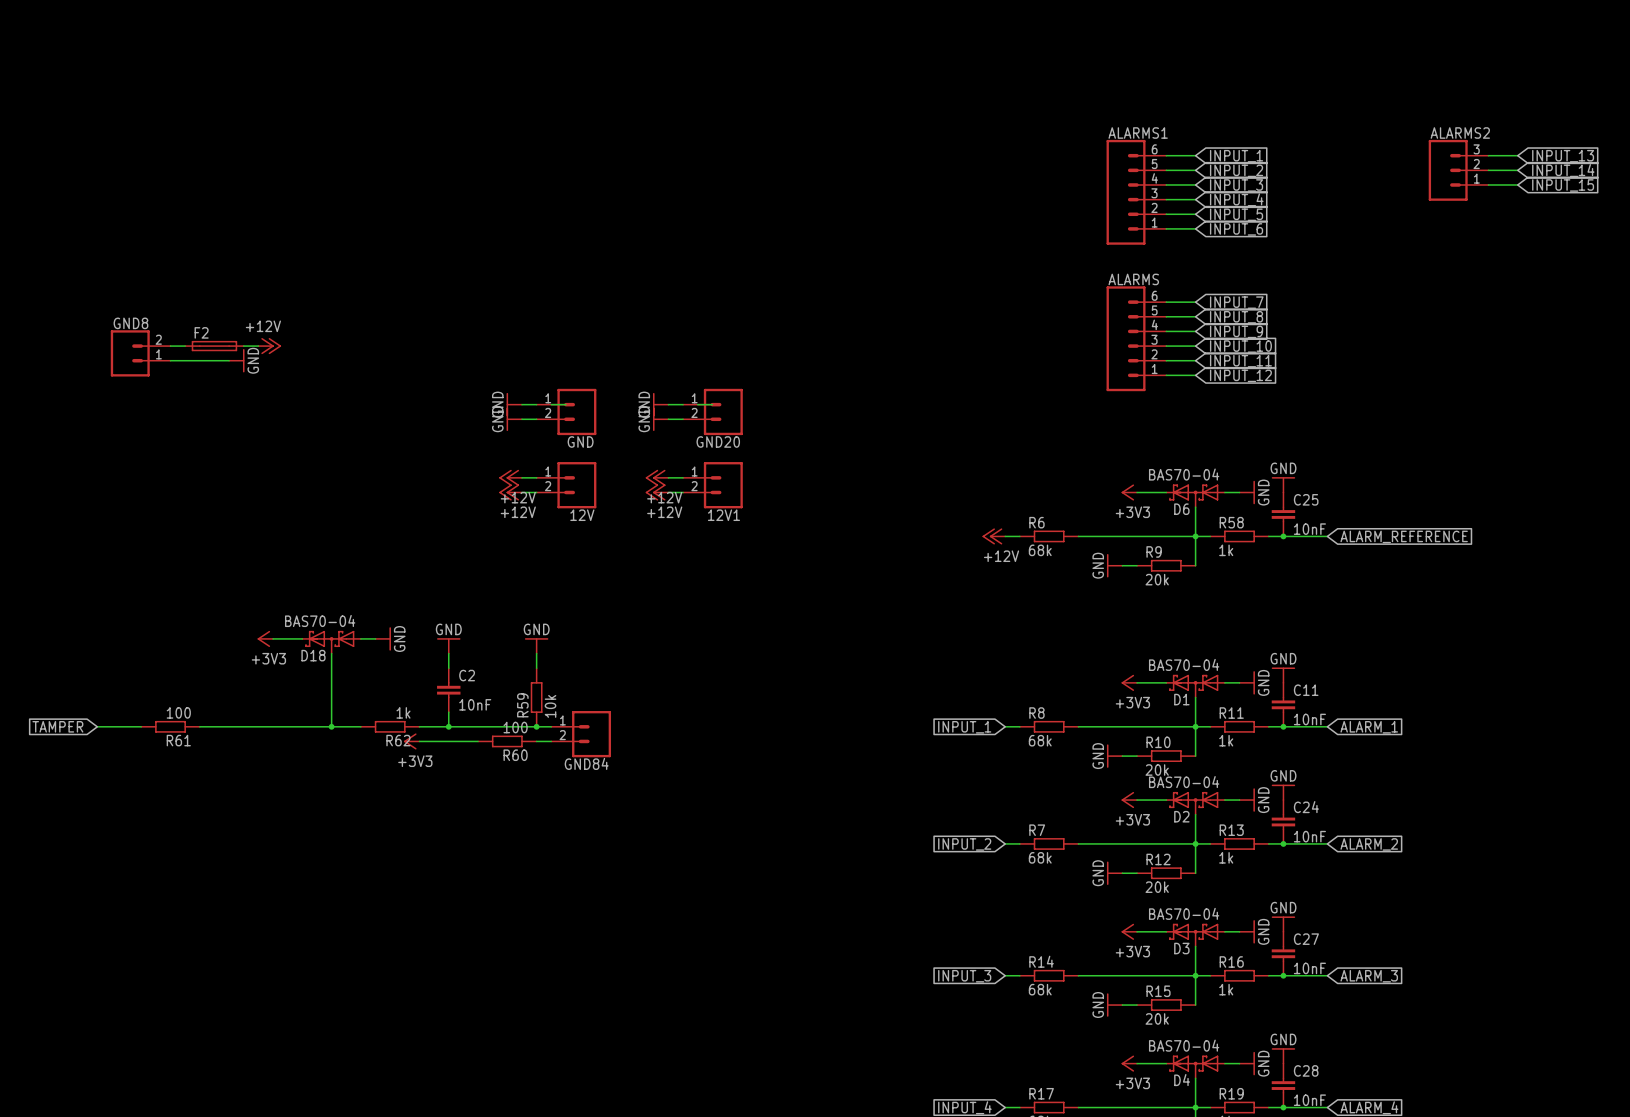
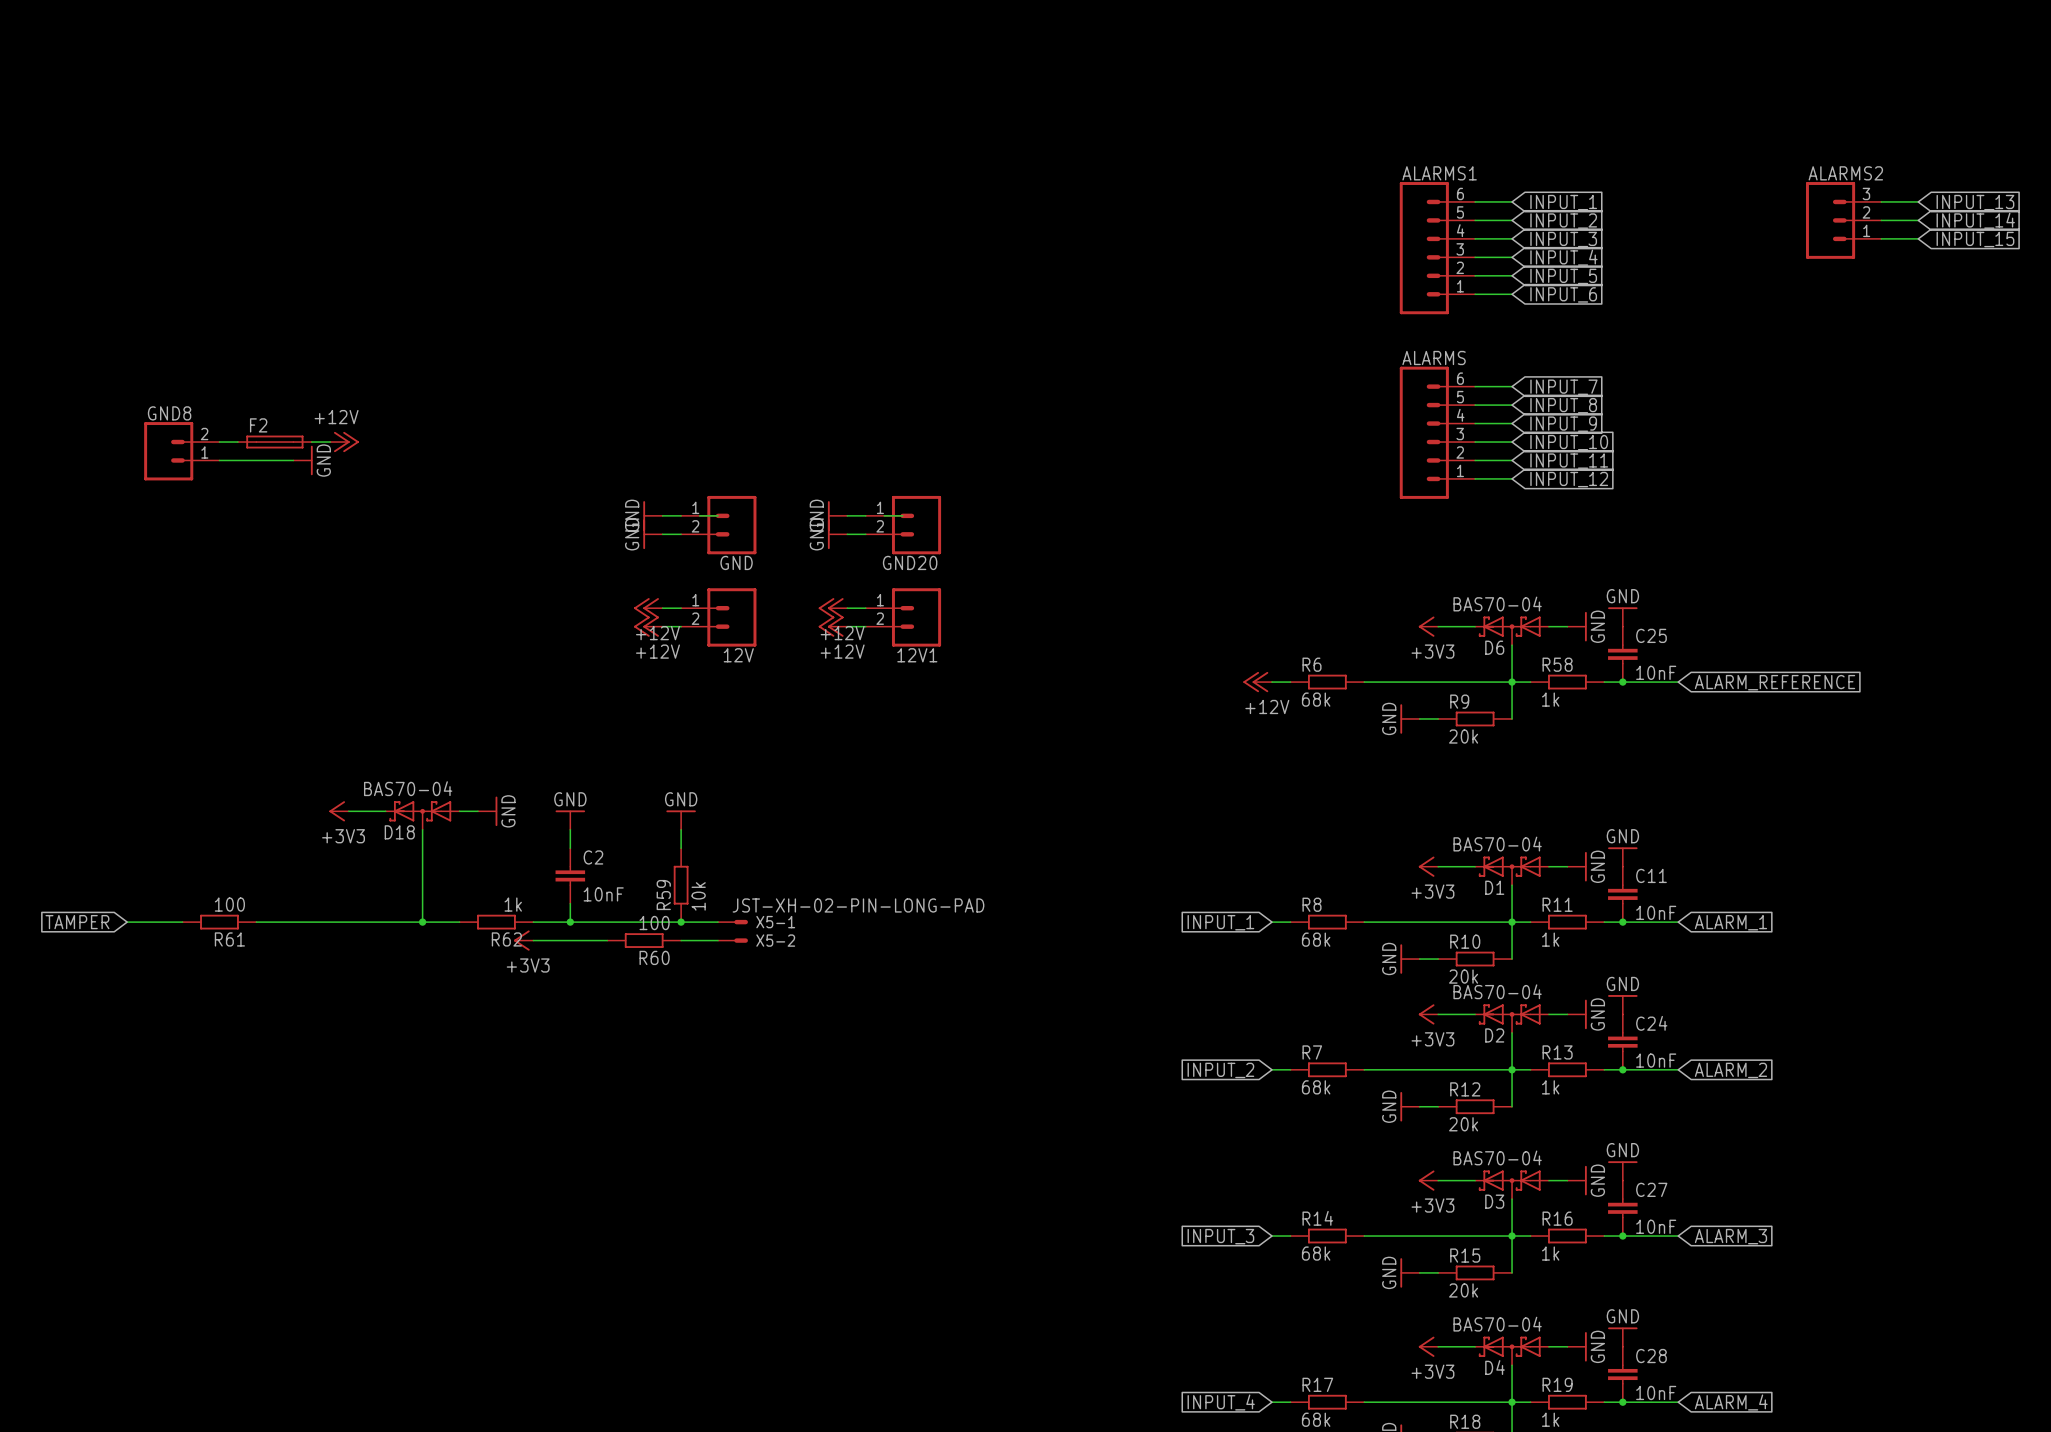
X5-1: none -> JST-XH-02-PIN-LONG-PAD (732, 922)
GND84: (581, 734) -> none
X5-2: none -> (732, 940)

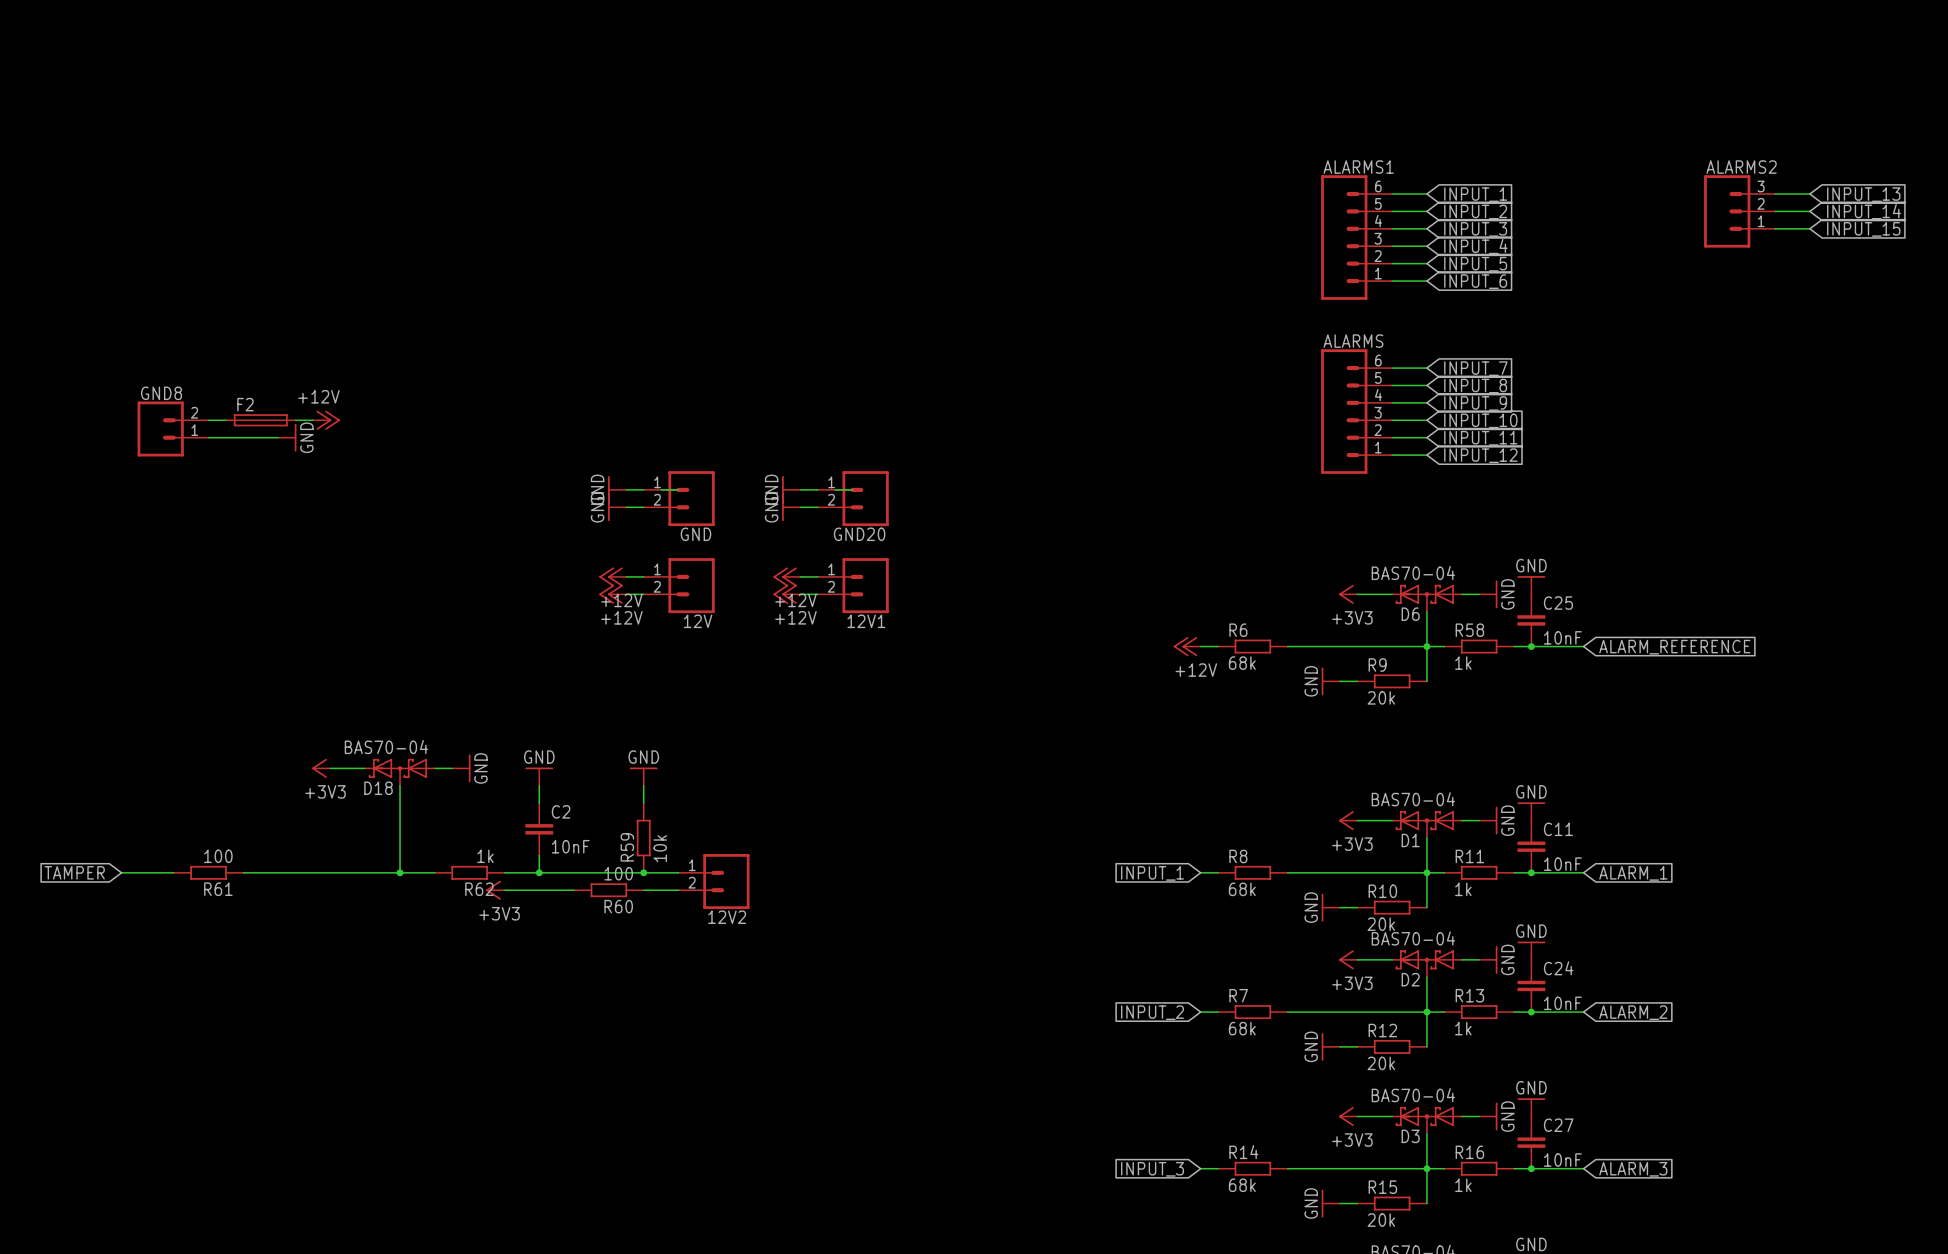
X5-1: JST-XH-02-PIN-LONG-PAD (732, 922) -> none
12V2: none -> (714, 881)
X5-2: (732, 940) -> none

